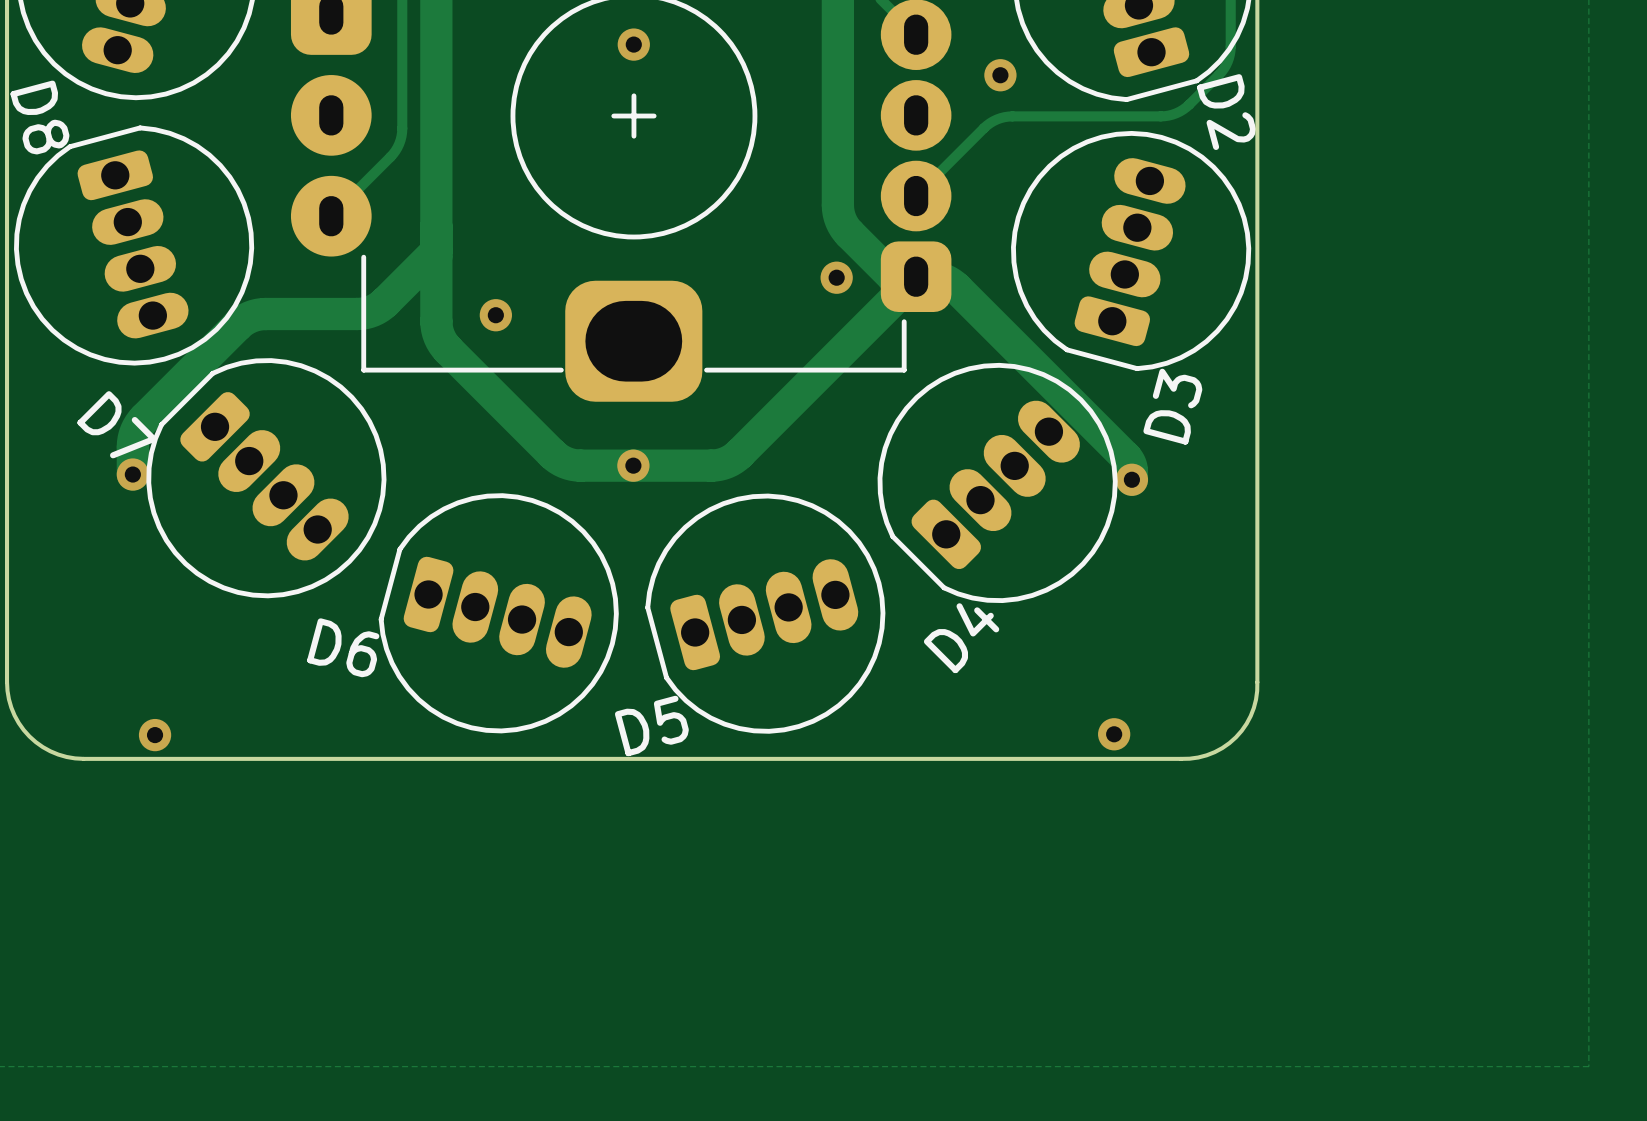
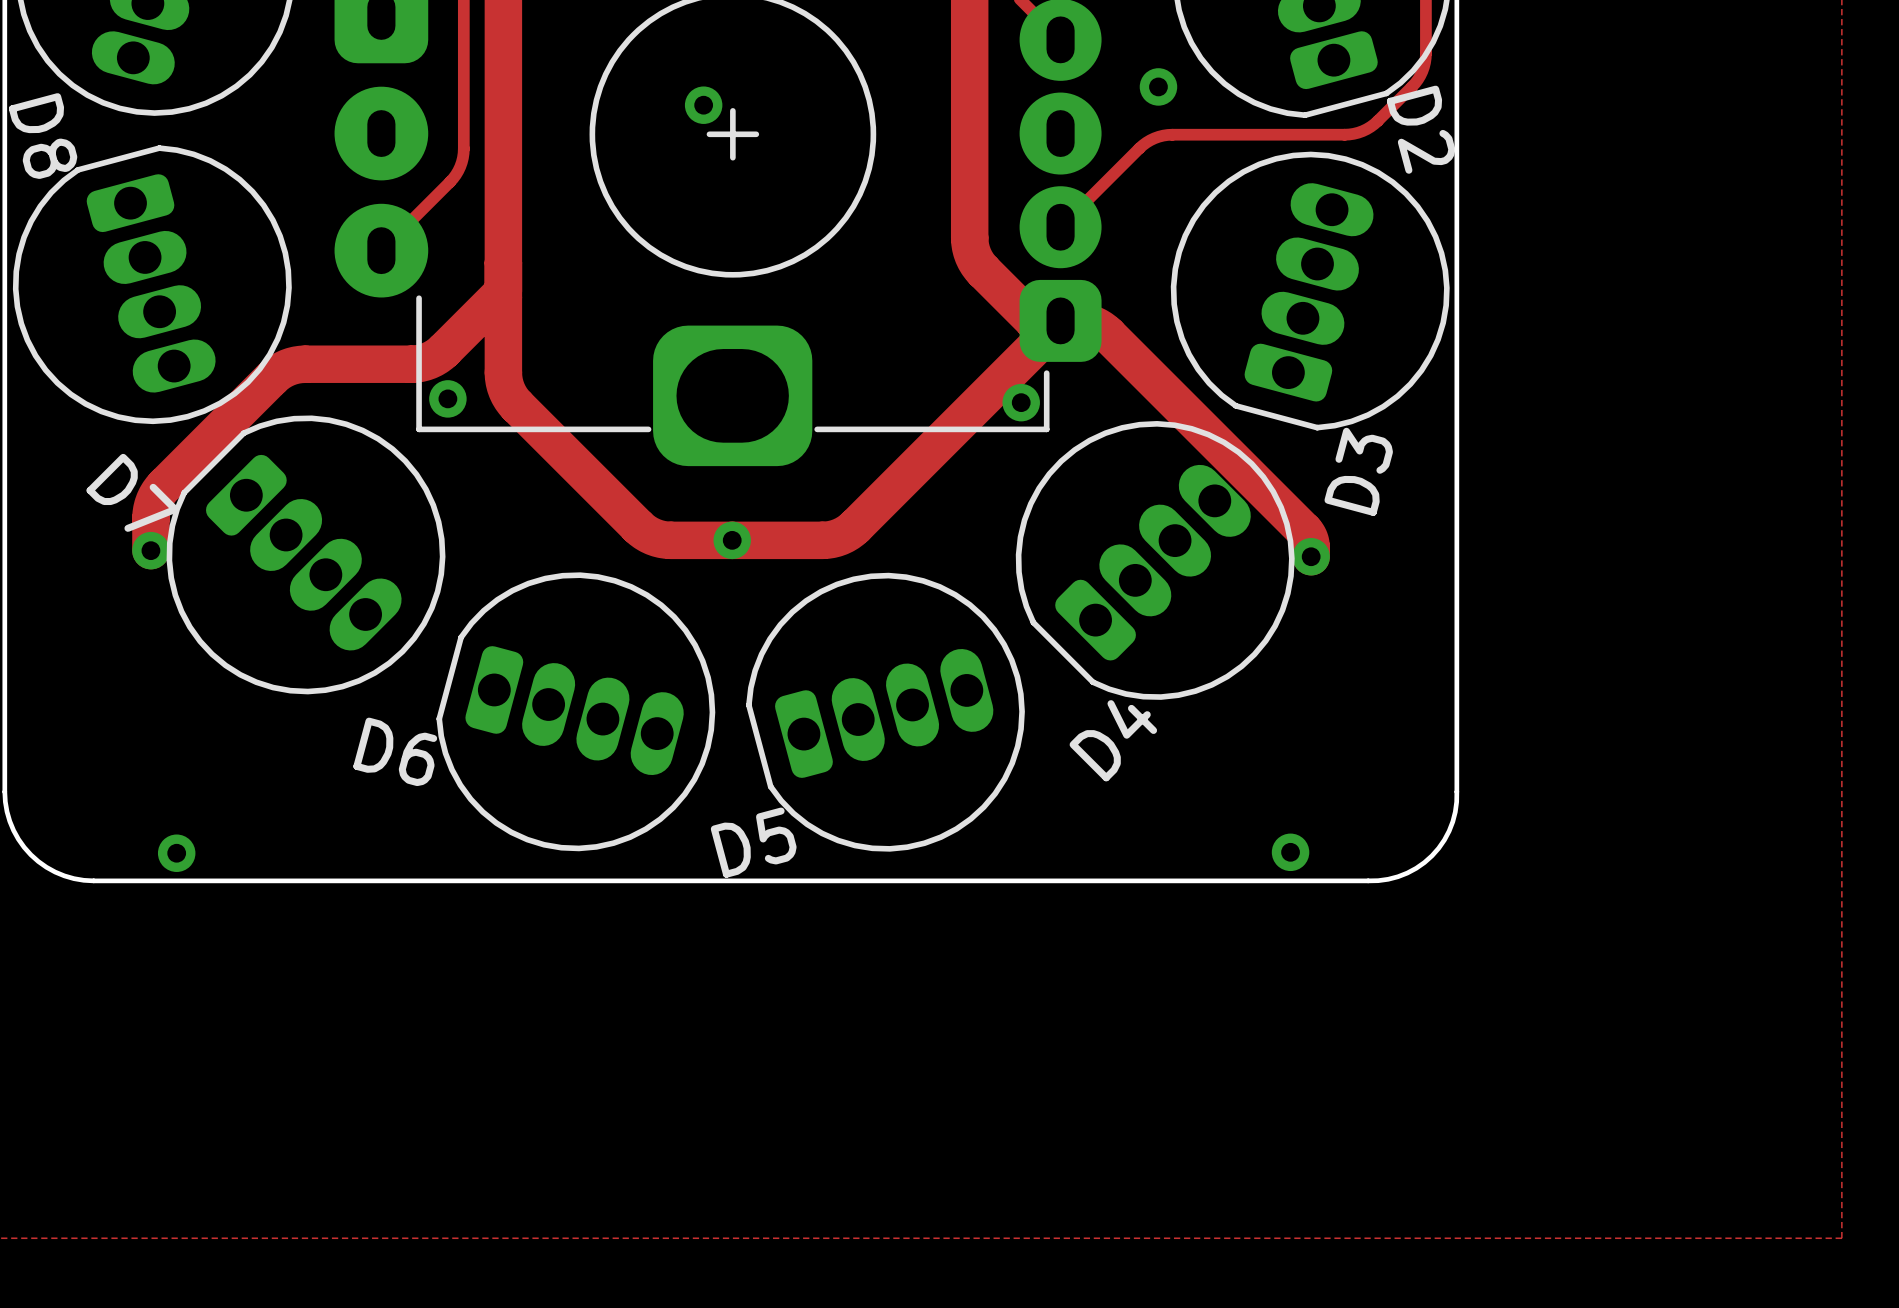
via position: (633, 44) -> (703, 105)
via position: (836, 277) -> (1021, 402)
via position: (495, 315) -> (447, 398)

